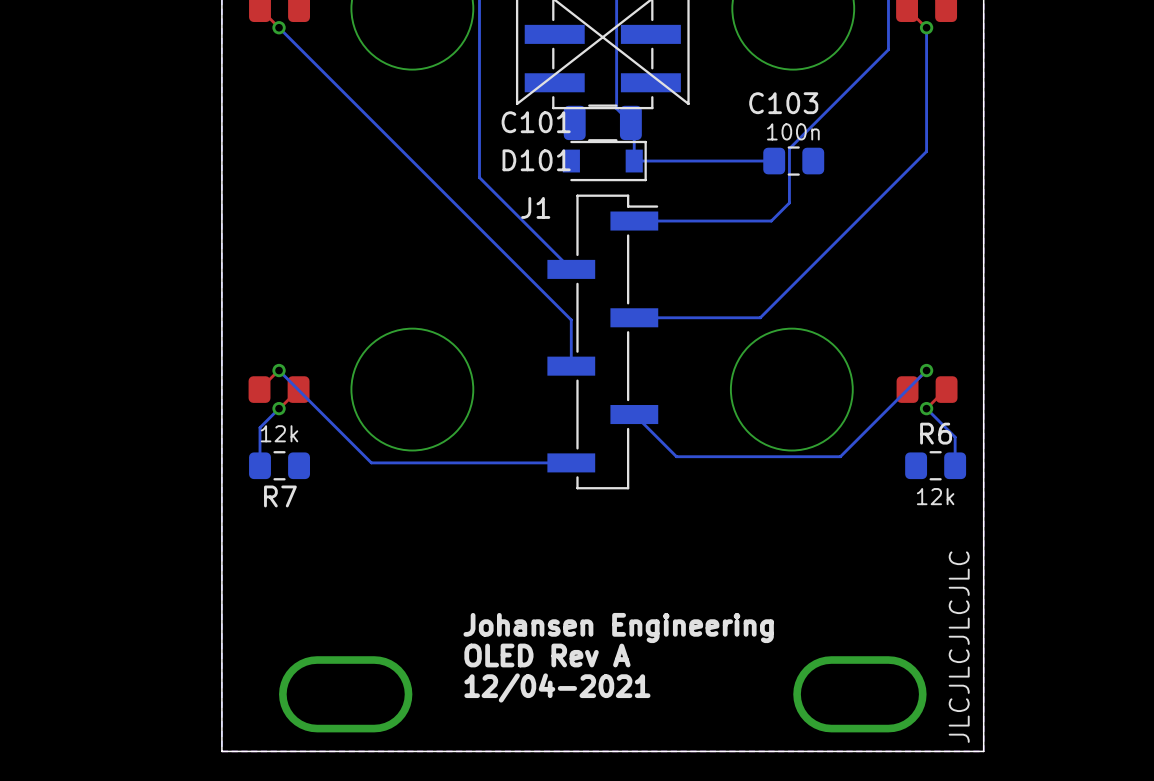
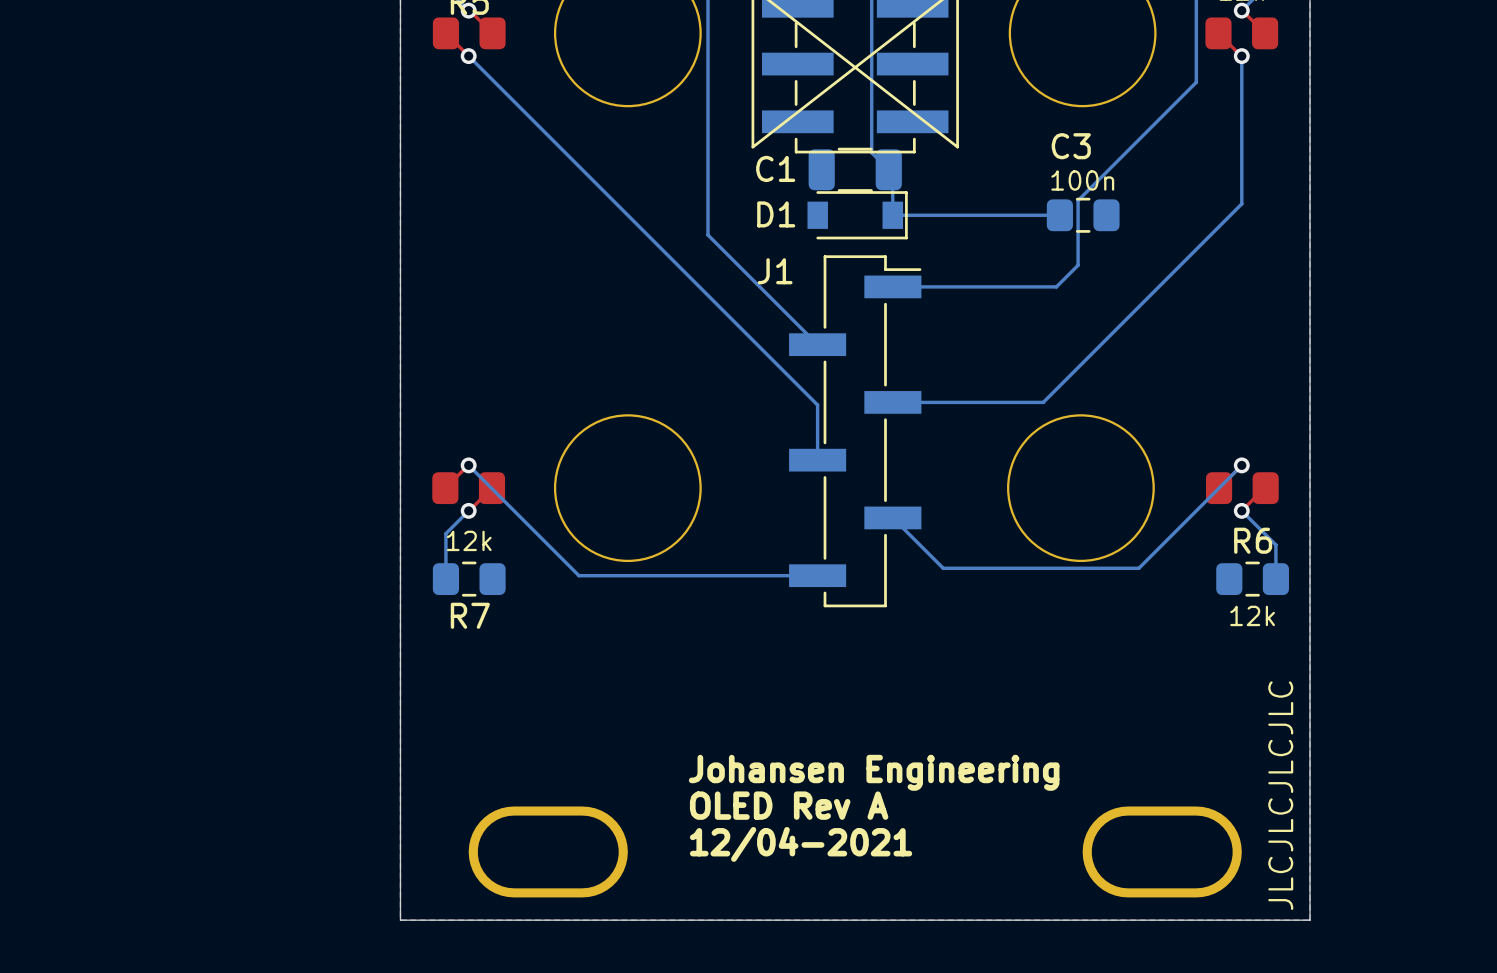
C103 name: C103 (783, 103) -> C3 (1071, 146)
C101 name: C101 (536, 122) -> C1 (775, 168)
D101 name: D101 (536, 160) -> D1 (776, 214)

